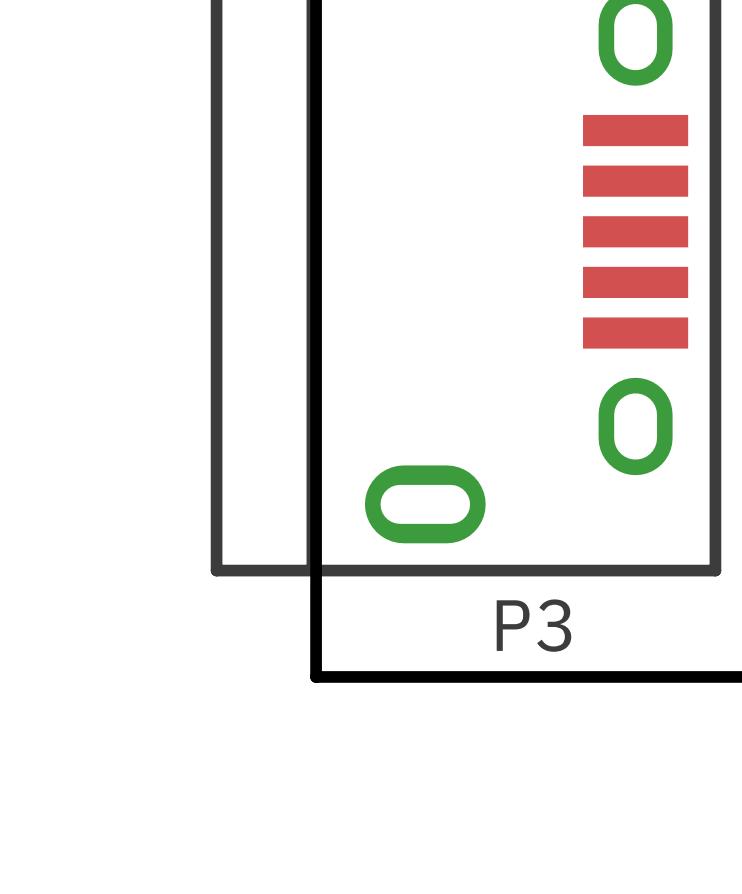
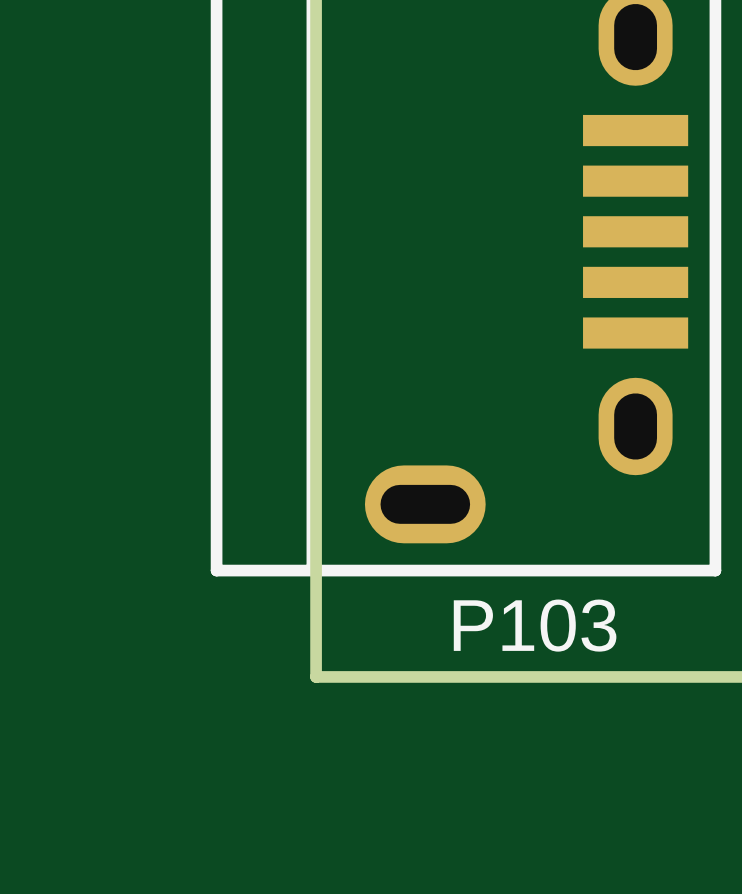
P3 name: P3 (533, 625) -> P103 (535, 625)

